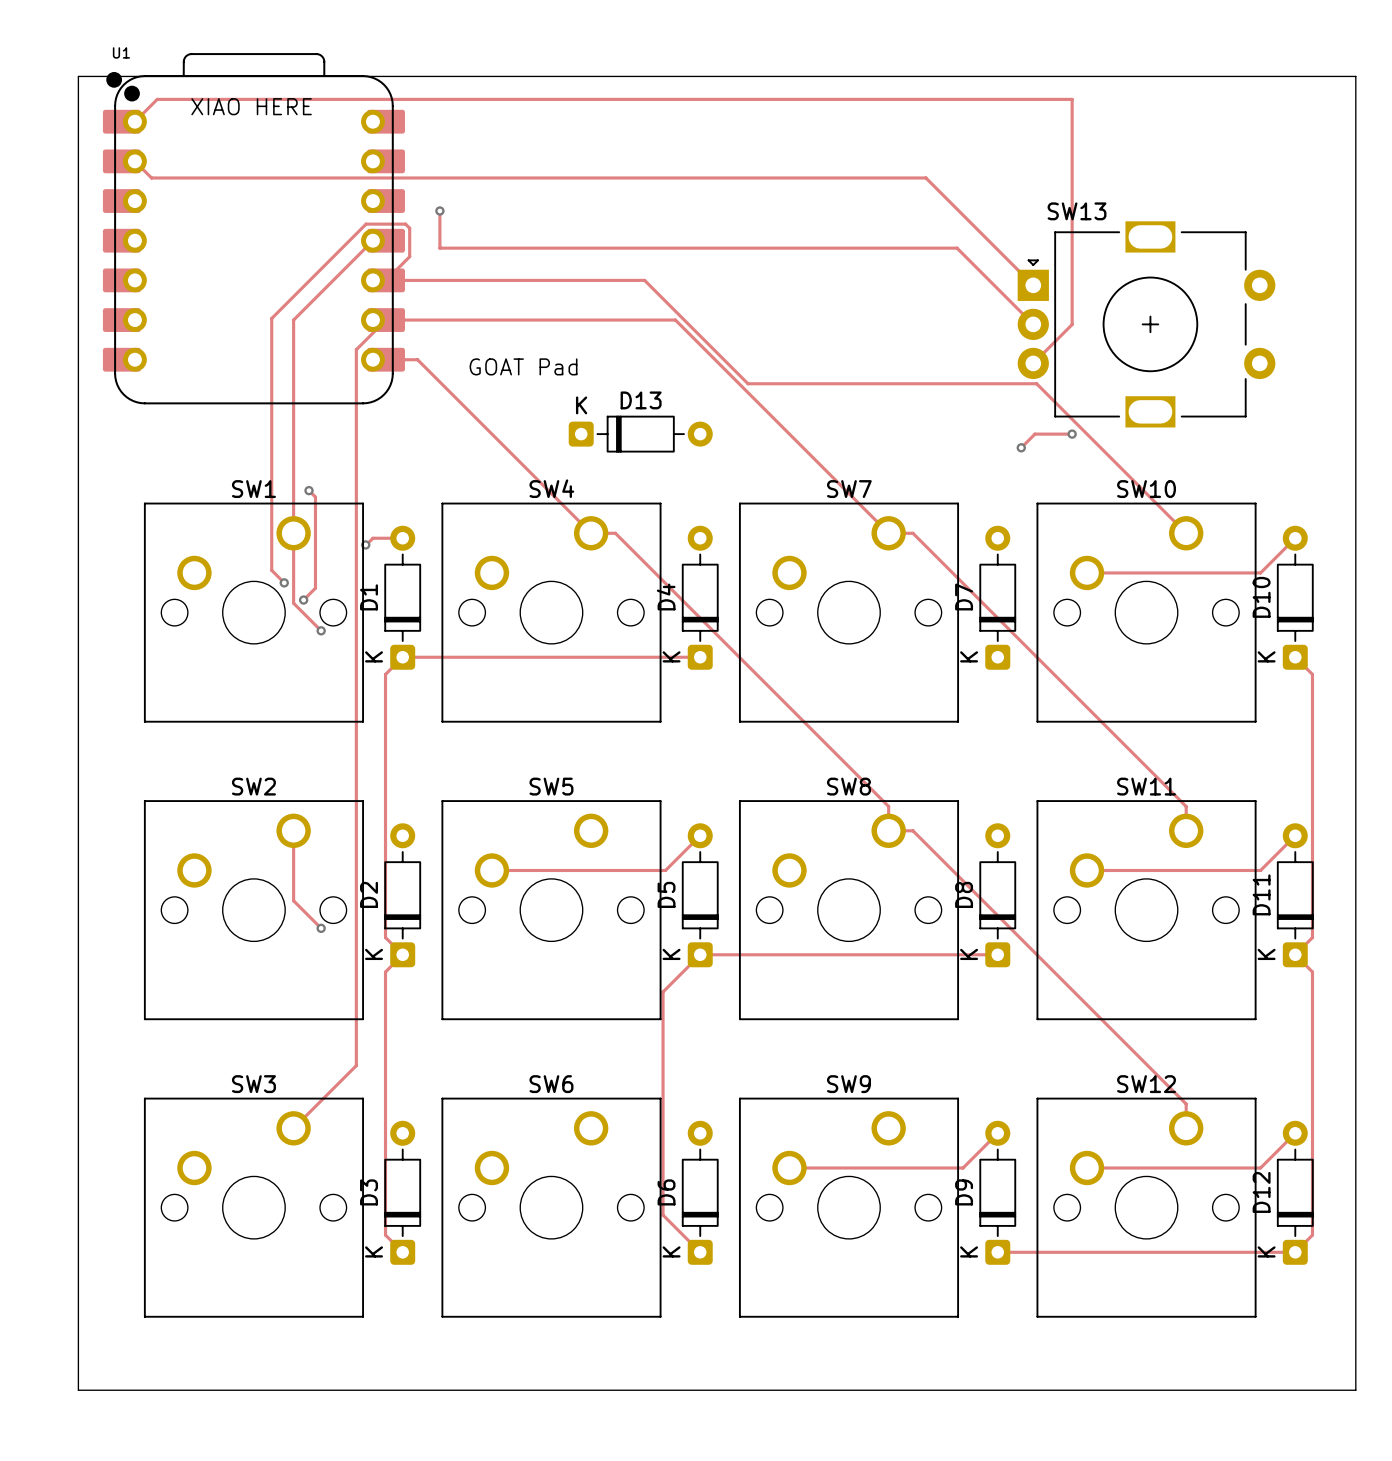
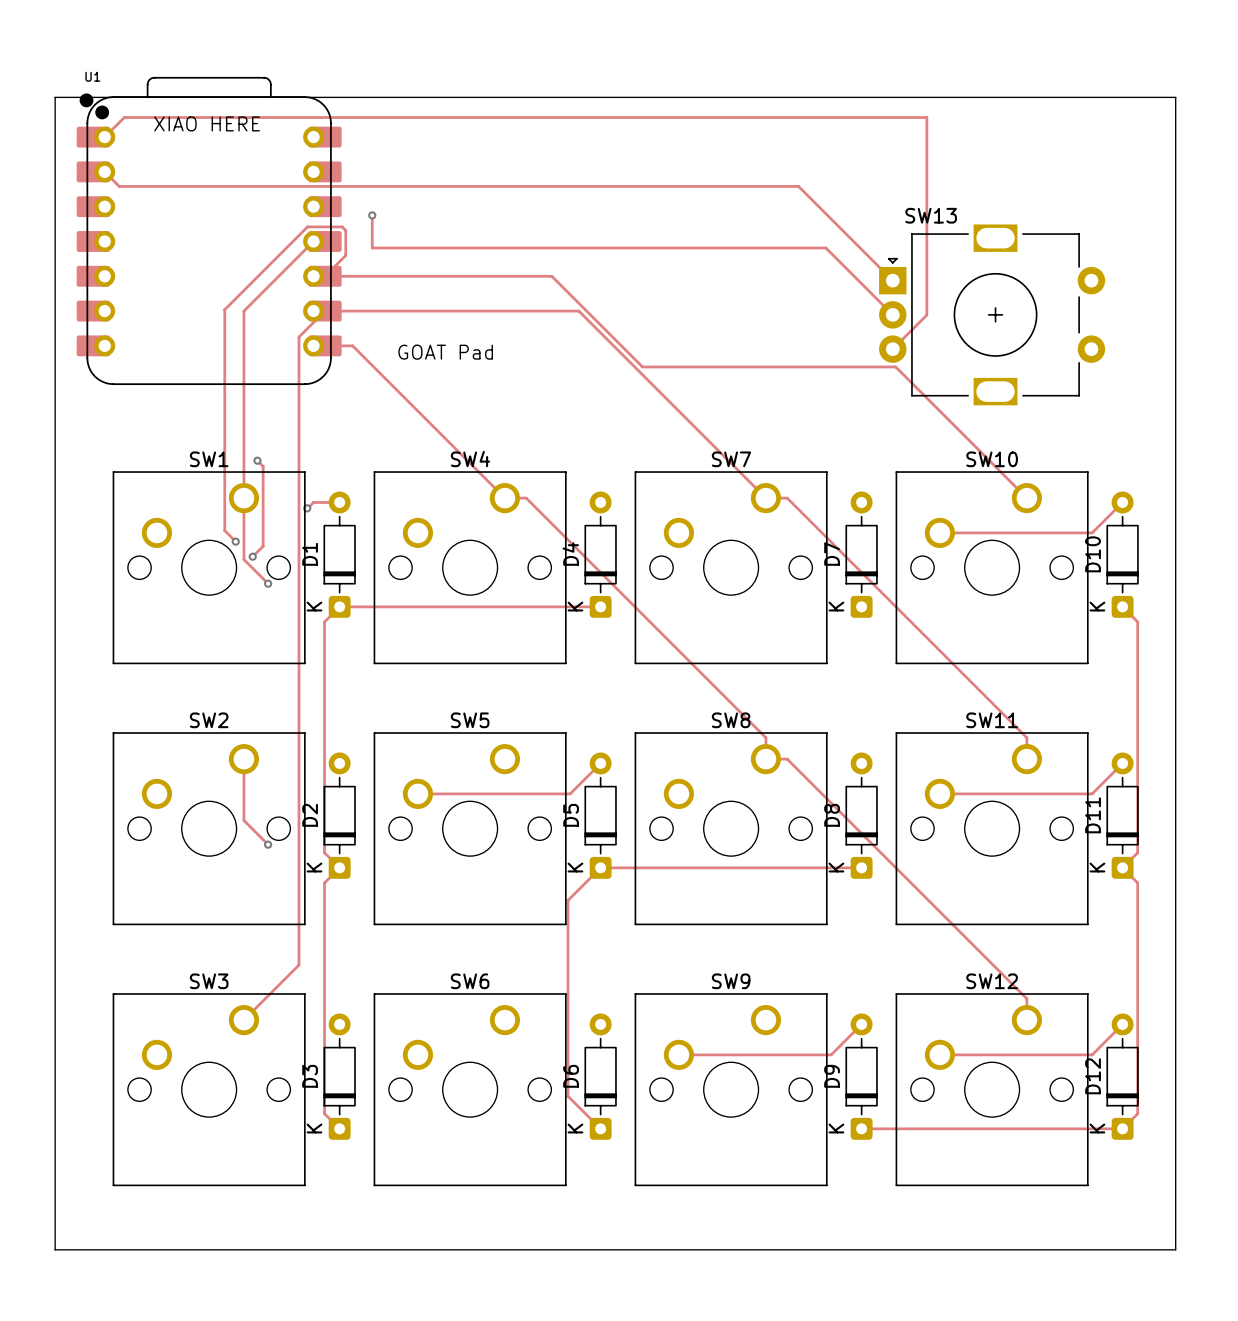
D13: (640, 434) -> none
track: (1072, 434) (1034, 434) (1021, 447) -> none
via: (1072, 434) -> none
via: (1021, 447) -> none

